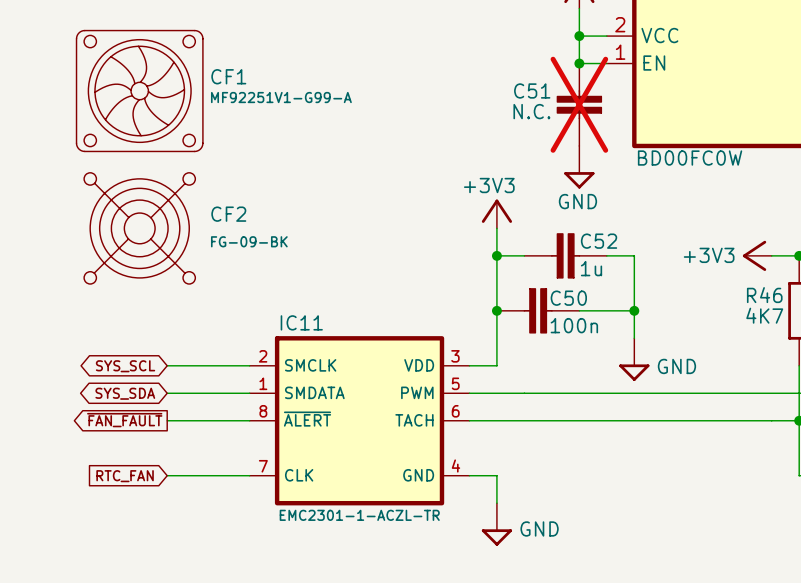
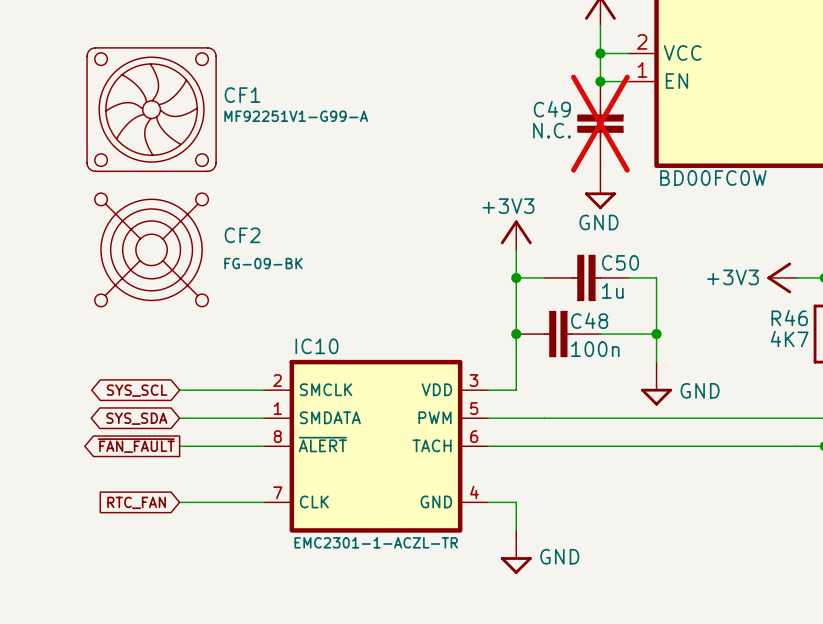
C51 name: C51 (532, 90) -> C49 (552, 109)
C52 name: C52 (599, 241) -> C50 (620, 262)
C50 name: C50 (568, 298) -> C48 (589, 320)
IC11 name: IC11 (301, 322) -> IC10 (316, 346)

